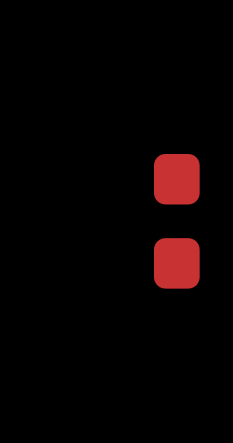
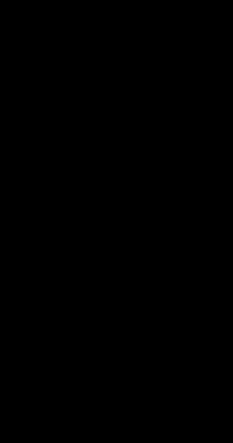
part: (176, 221) -> none

